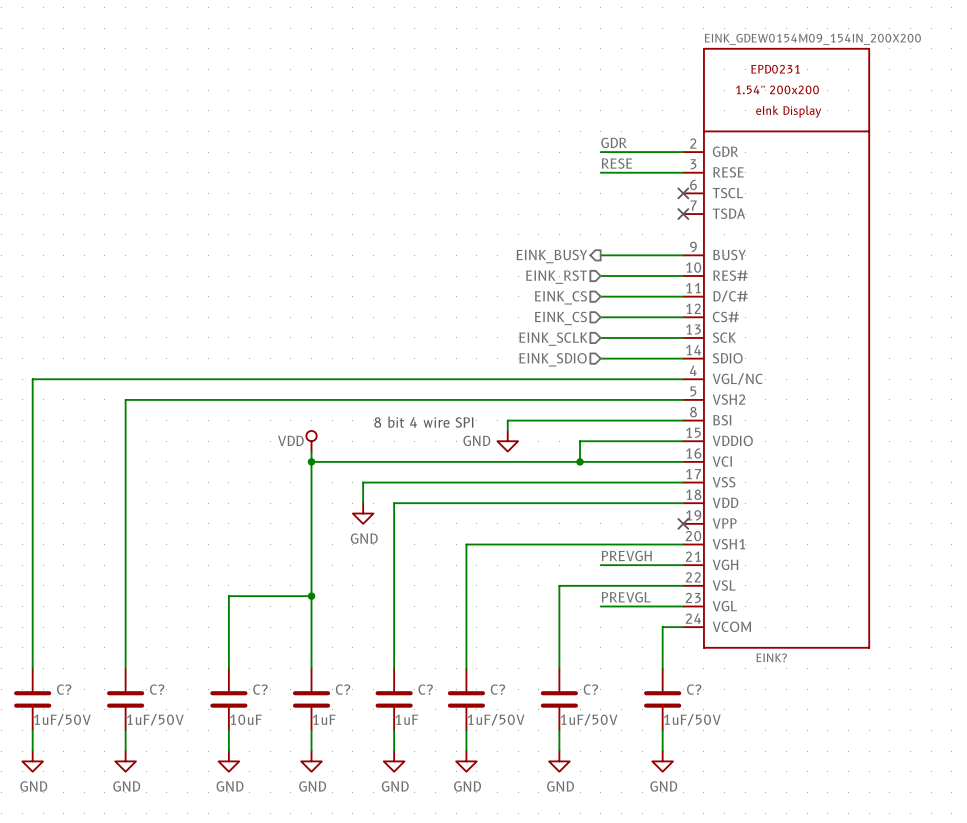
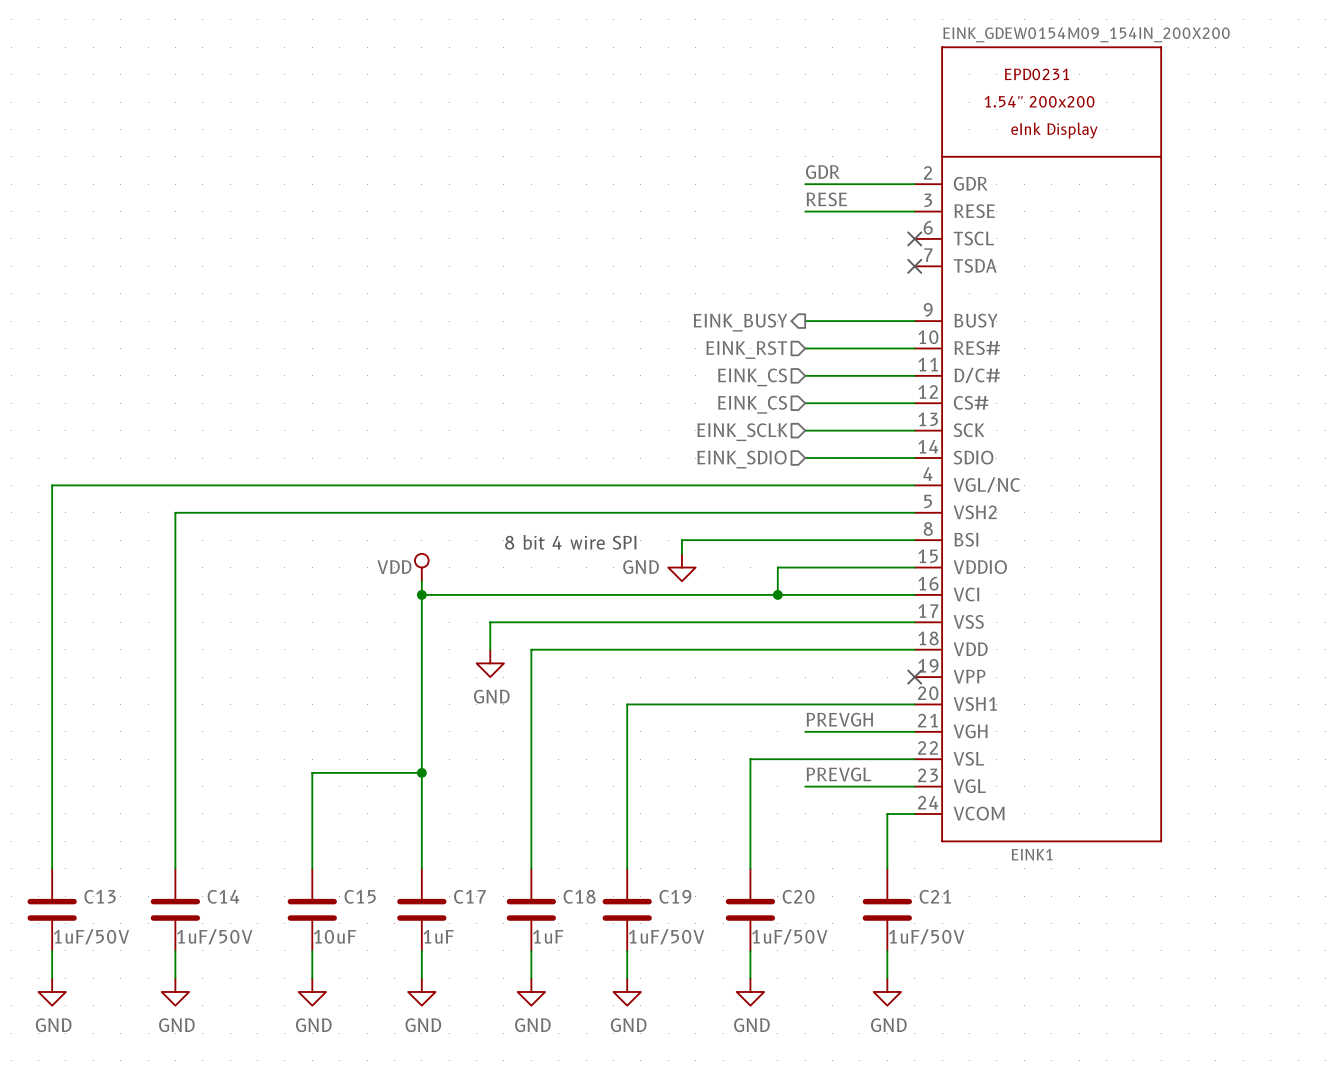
EINK? name: EINK? (771, 657) -> EINK1 (1032, 854)
C? name: C? (64, 689) -> C13 (100, 896)
C? name: C? (157, 689) -> C14 (223, 896)
C? name: C? (260, 689) -> C15 (360, 896)
C? name: C? (343, 689) -> C17 (469, 896)
C? name: C? (425, 689) -> C18 (579, 896)
C? name: C? (497, 689) -> C19 (675, 896)
C? name: C? (590, 689) -> C20 (798, 896)
C? name: C? (694, 689) -> C21 (935, 896)

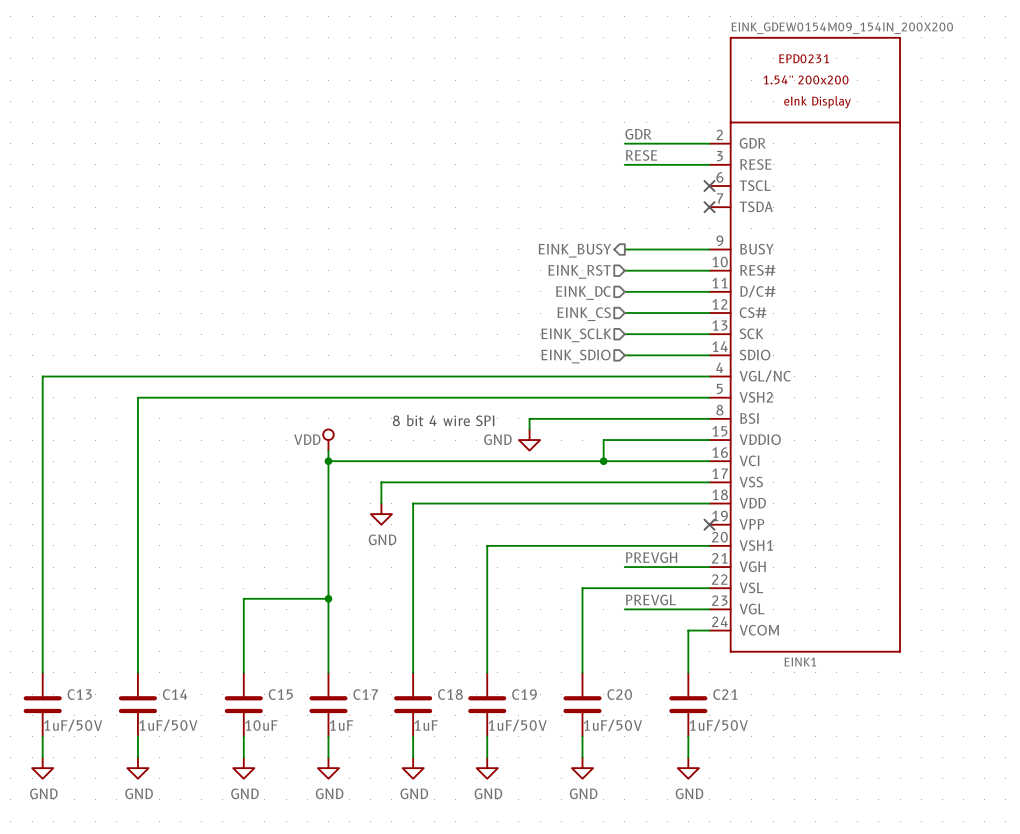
hierarchical label: EINK_CS (752, 377) -> EINK_DC (583, 293)

